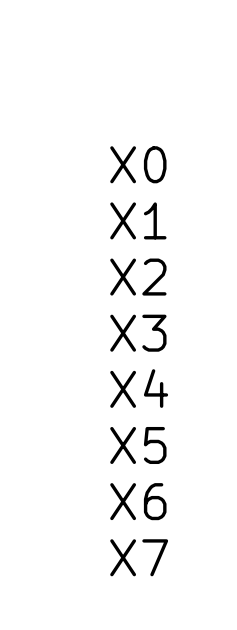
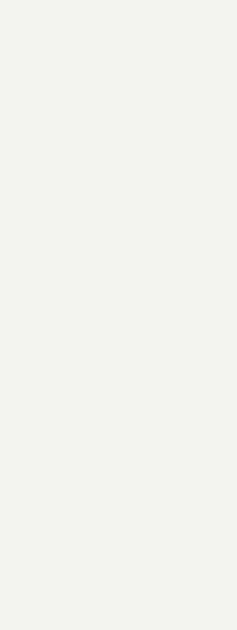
label: X0 (138, 164) -> none
label: X1 (138, 220) -> none
label: X2 (138, 277) -> none
label: X3 (138, 333) -> none
label: X4 (139, 388) -> none
label: X5 (138, 445) -> none
label: X6 (138, 501) -> none
label: X7 (139, 557) -> none

